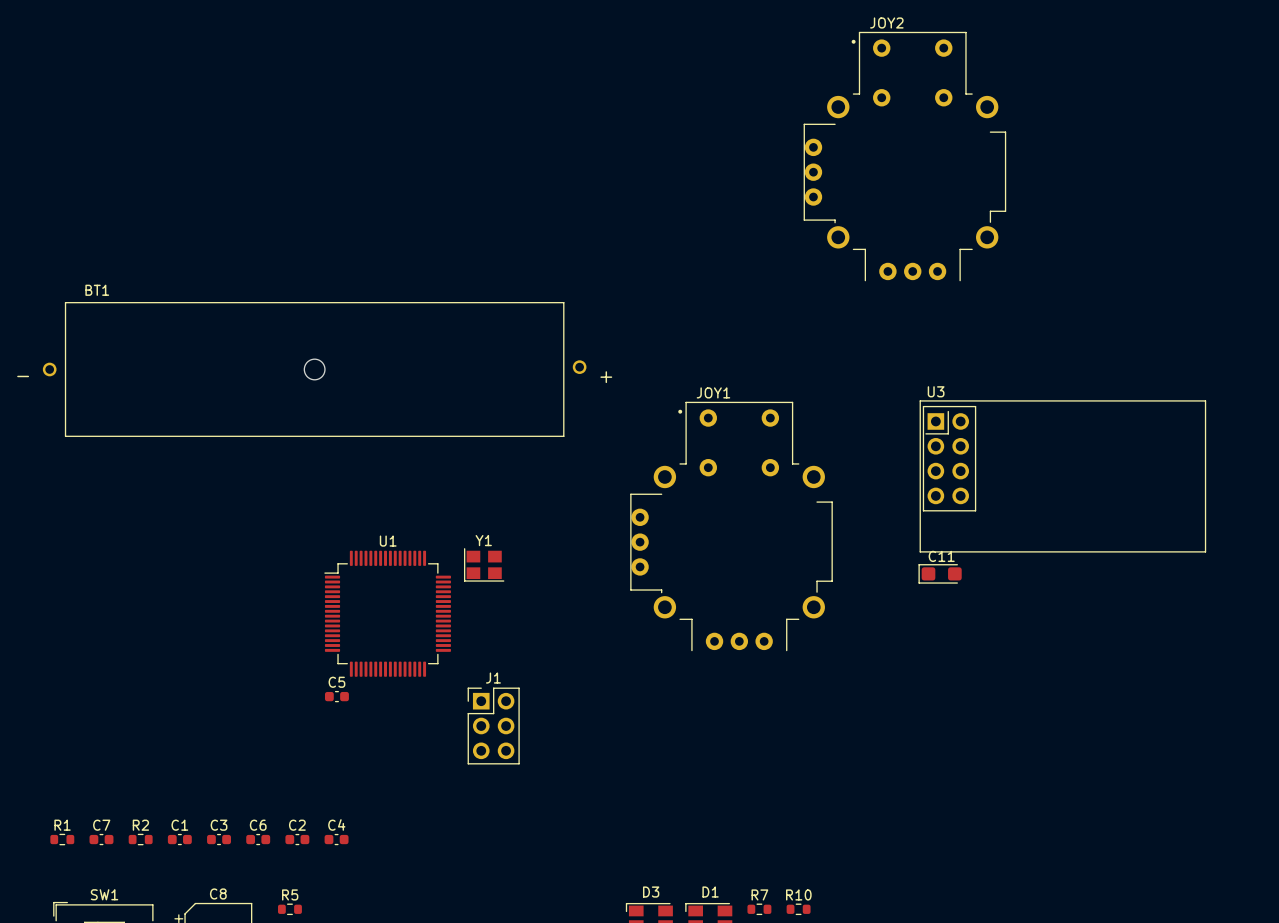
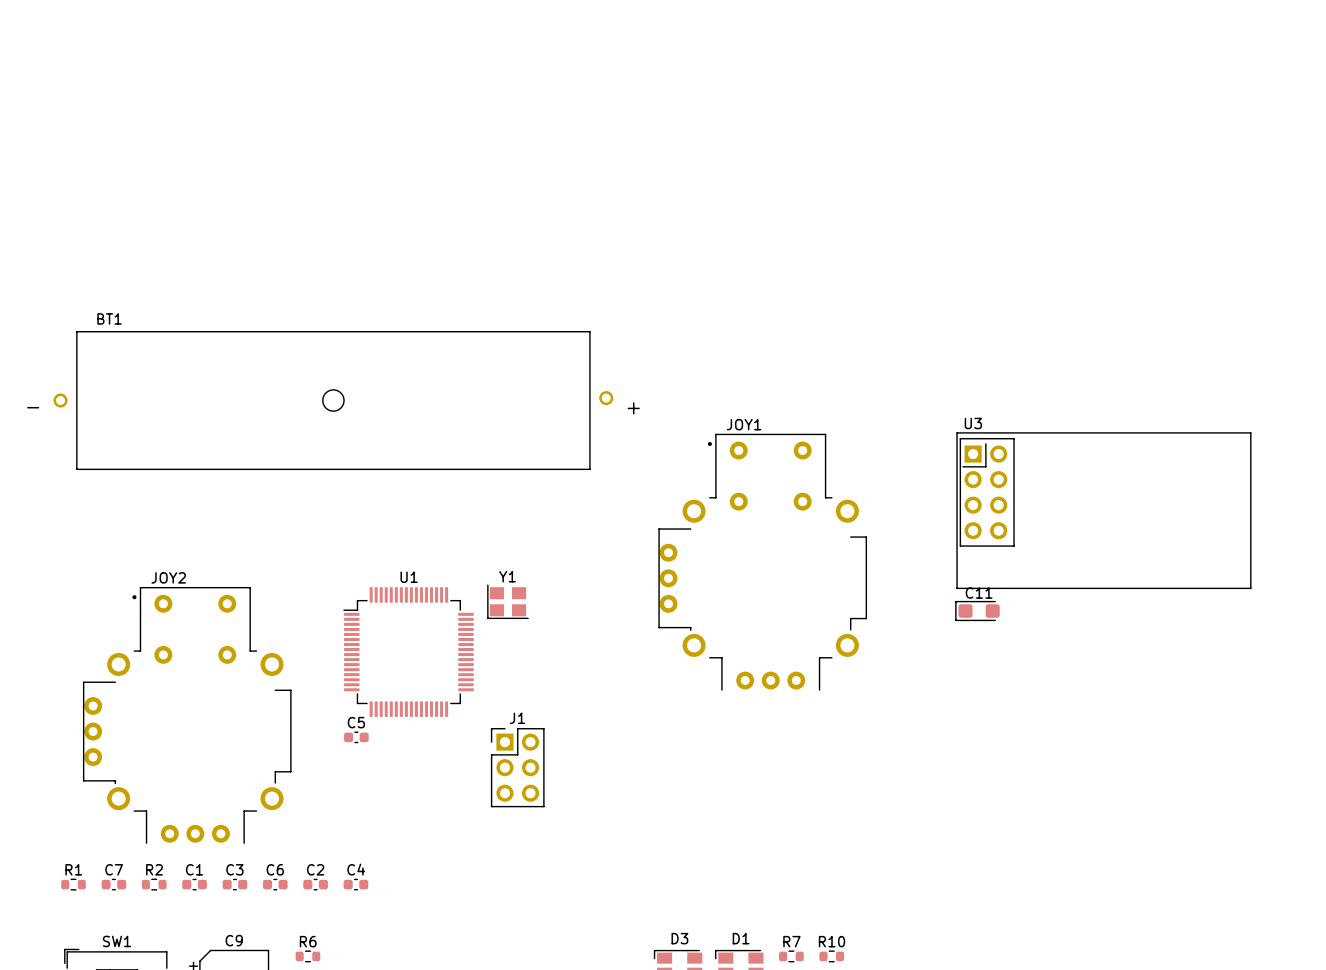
JOY2 position: (904, 156) -> (187, 715)
C8 name: C8 (218, 893) -> C9 (234, 940)
R5 name: R5 (290, 894) -> R6 (308, 941)

